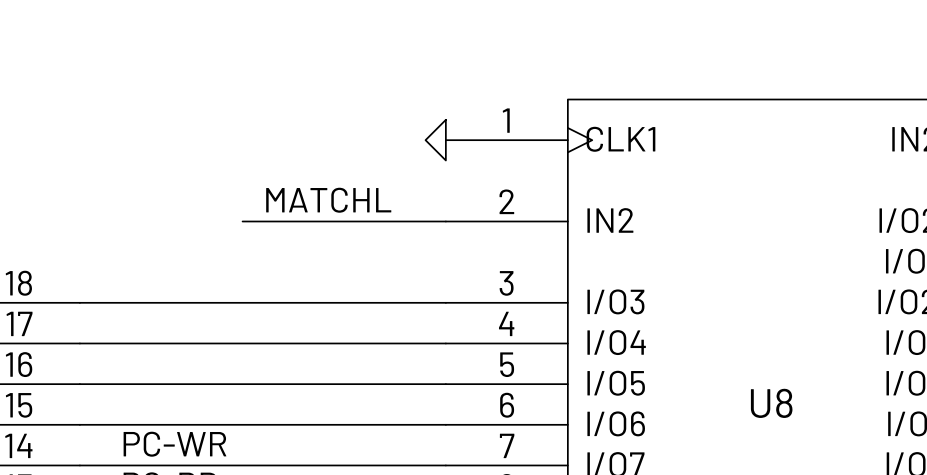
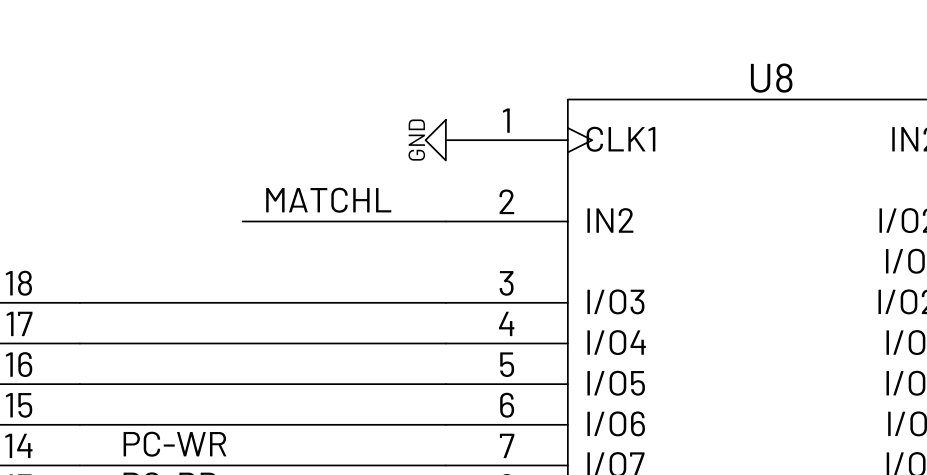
power symbol text: none -> GND (416, 140)
U8 name position: U8 (771, 403) -> U8 (771, 78)

